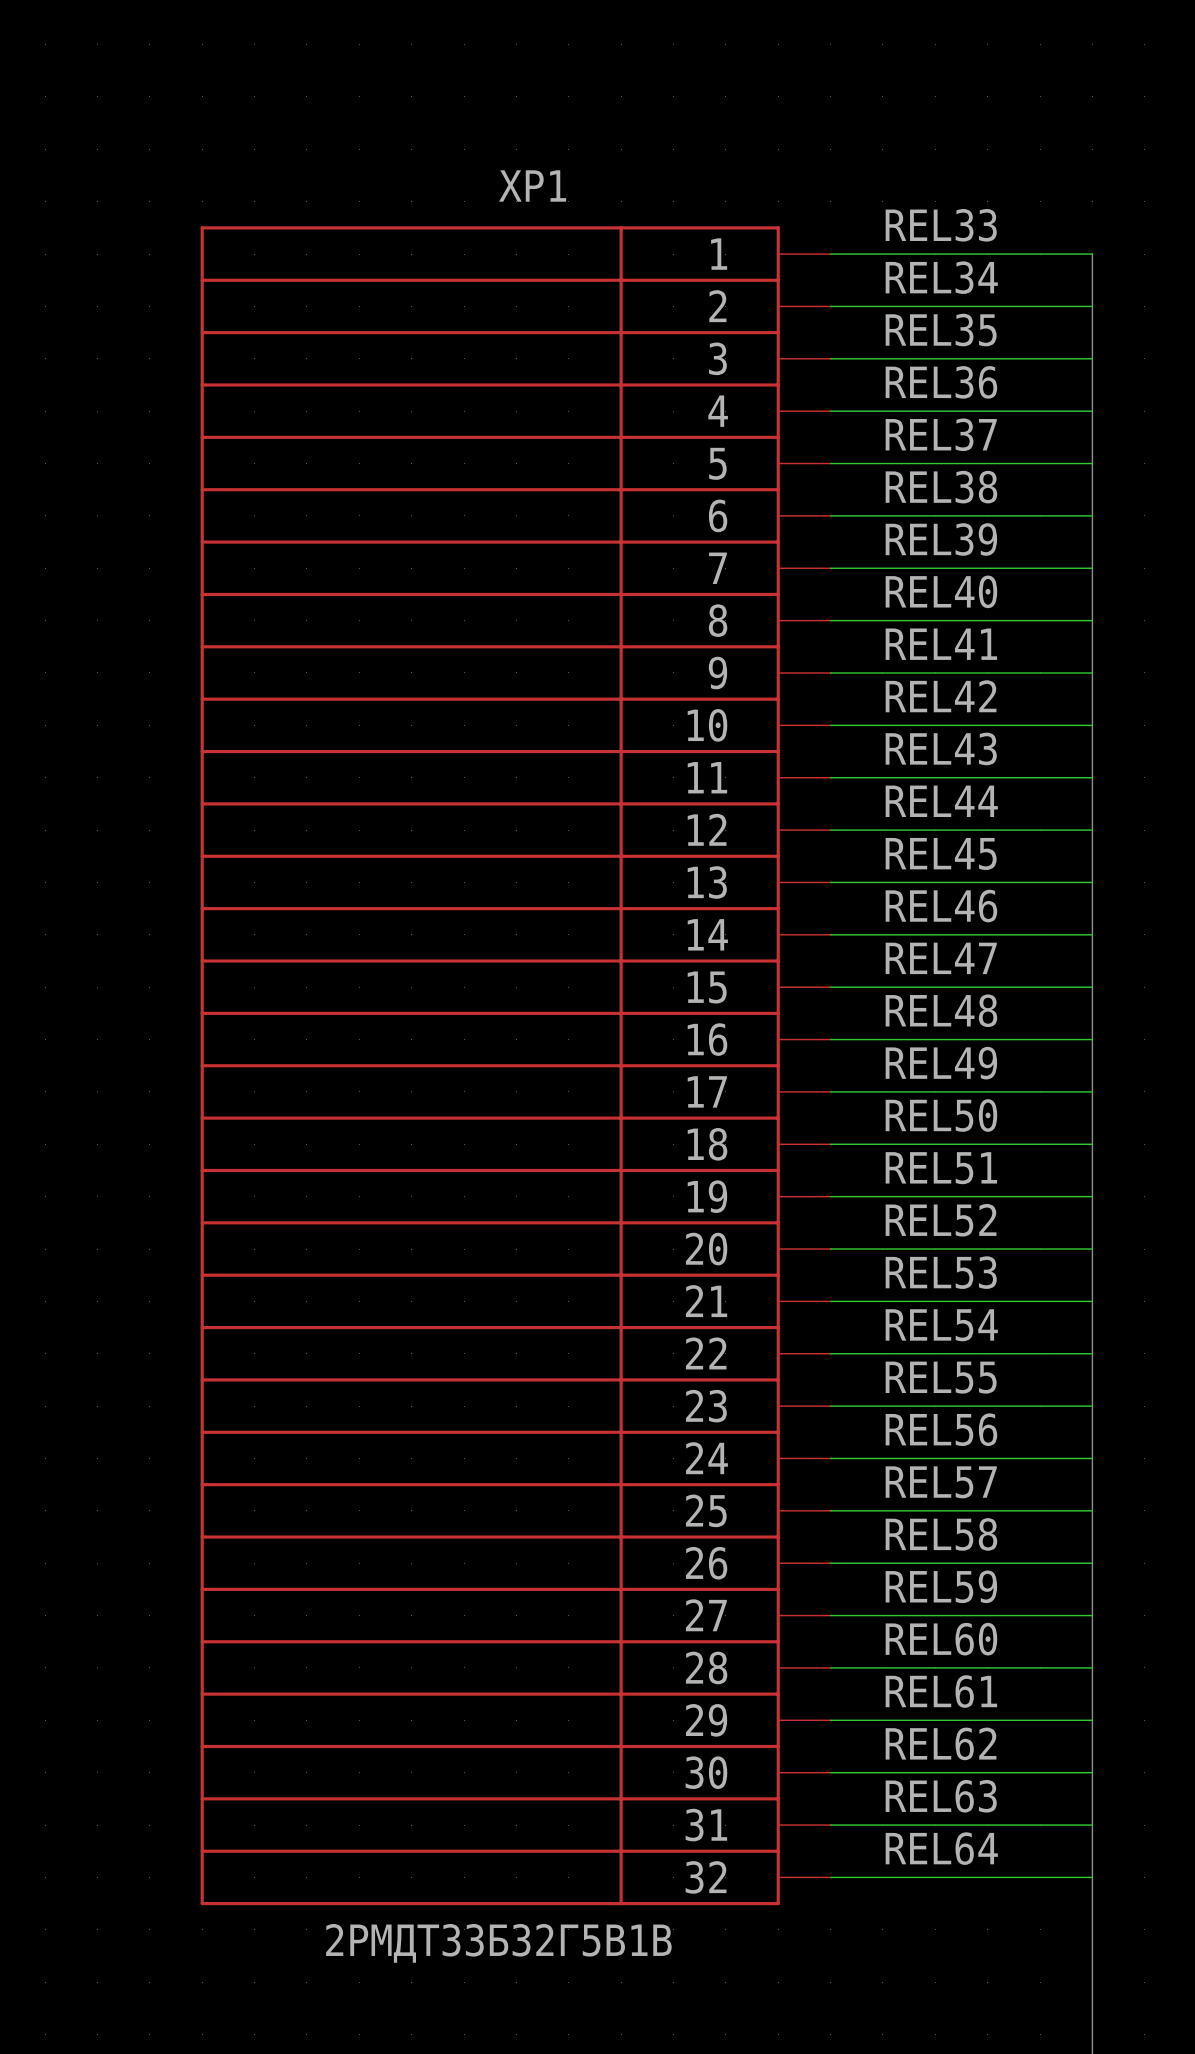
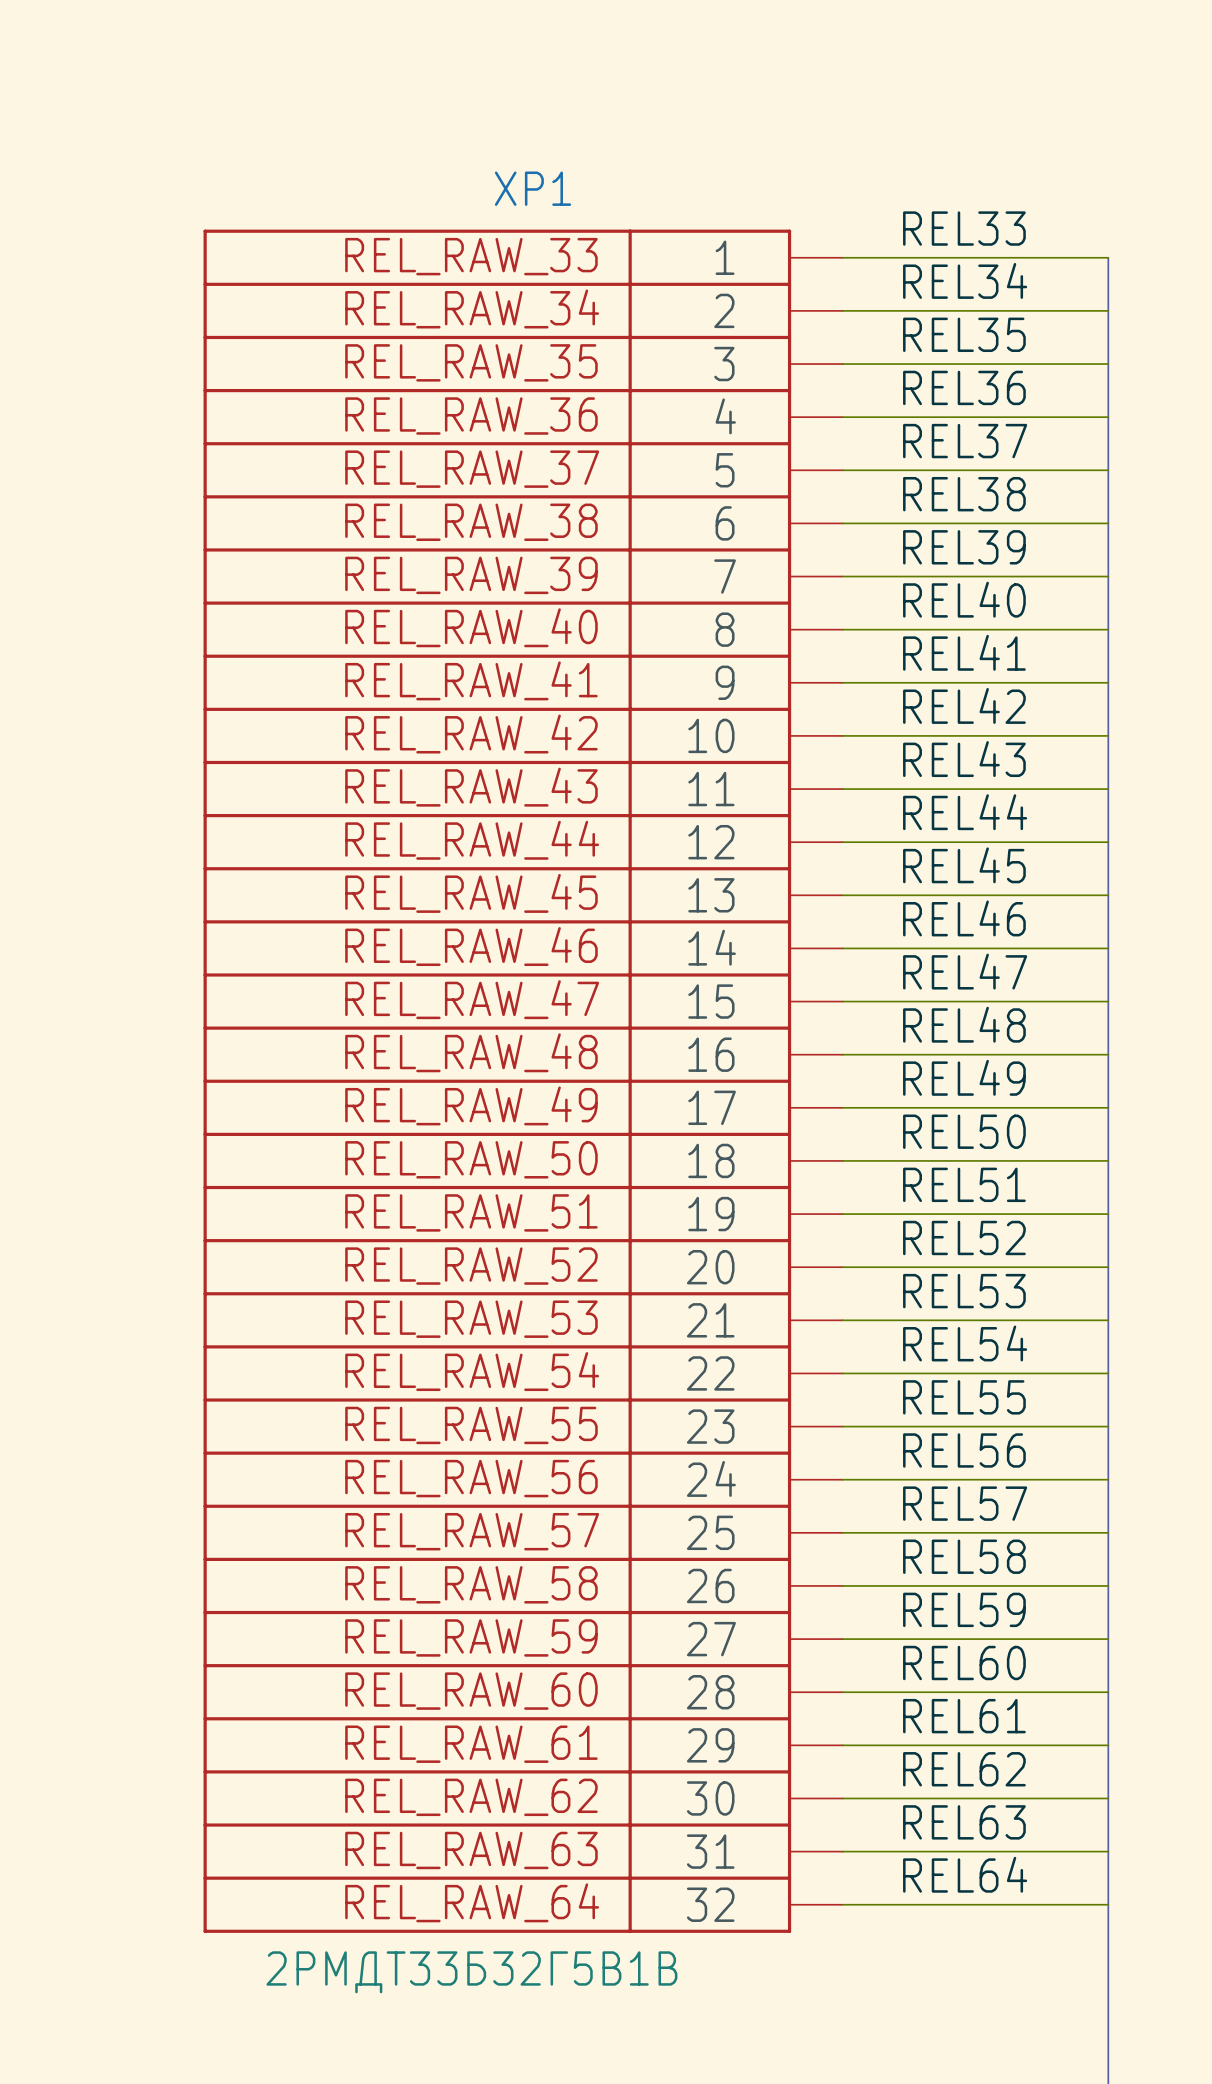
text: none -> REL_RAW_33 (471, 256)
text: none -> REL_RAW_34 (472, 309)
text: none -> REL_RAW_35 (471, 362)
text: none -> REL_RAW_36 (471, 416)
text: none -> REL_RAW_37 (472, 469)
text: none -> REL_RAW_38 (471, 522)
text: none -> REL_RAW_39 (471, 575)
text: none -> REL_RAW_40 (471, 627)
text: none -> REL_RAW_41 (471, 680)
text: none -> REL_RAW_42 (471, 734)
text: none -> REL_RAW_43 (471, 787)
text: none -> REL_RAW_44 (472, 840)
text: none -> REL_RAW_45 (471, 893)
text: none -> REL_RAW_46 (471, 946)
text: none -> REL_RAW_47 (472, 999)
text: none -> REL_RAW_48 (471, 1052)
text: none -> REL_RAW_49 (471, 1105)
text: none -> REL_RAW_50 (471, 1159)
text: none -> REL_RAW_51 (471, 1212)
text: none -> REL_RAW_52 (471, 1266)
text: none -> REL_RAW_53 (471, 1319)
text: none -> REL_RAW_54 (472, 1371)
text: none -> REL_RAW_55 (471, 1425)
text: none -> REL_RAW_56 (471, 1478)
text: none -> REL_RAW_57 (472, 1531)
text: none -> REL_RAW_58 (471, 1584)
text: none -> REL_RAW_59 (471, 1637)
text: none -> REL_RAW_60 (471, 1691)
text: none -> REL_RAW_61 (471, 1744)
text: none -> REL_RAW_62 (471, 1797)
text: none -> REL_RAW_63 (471, 1850)
text: none -> REL_RAW_64 (472, 1902)

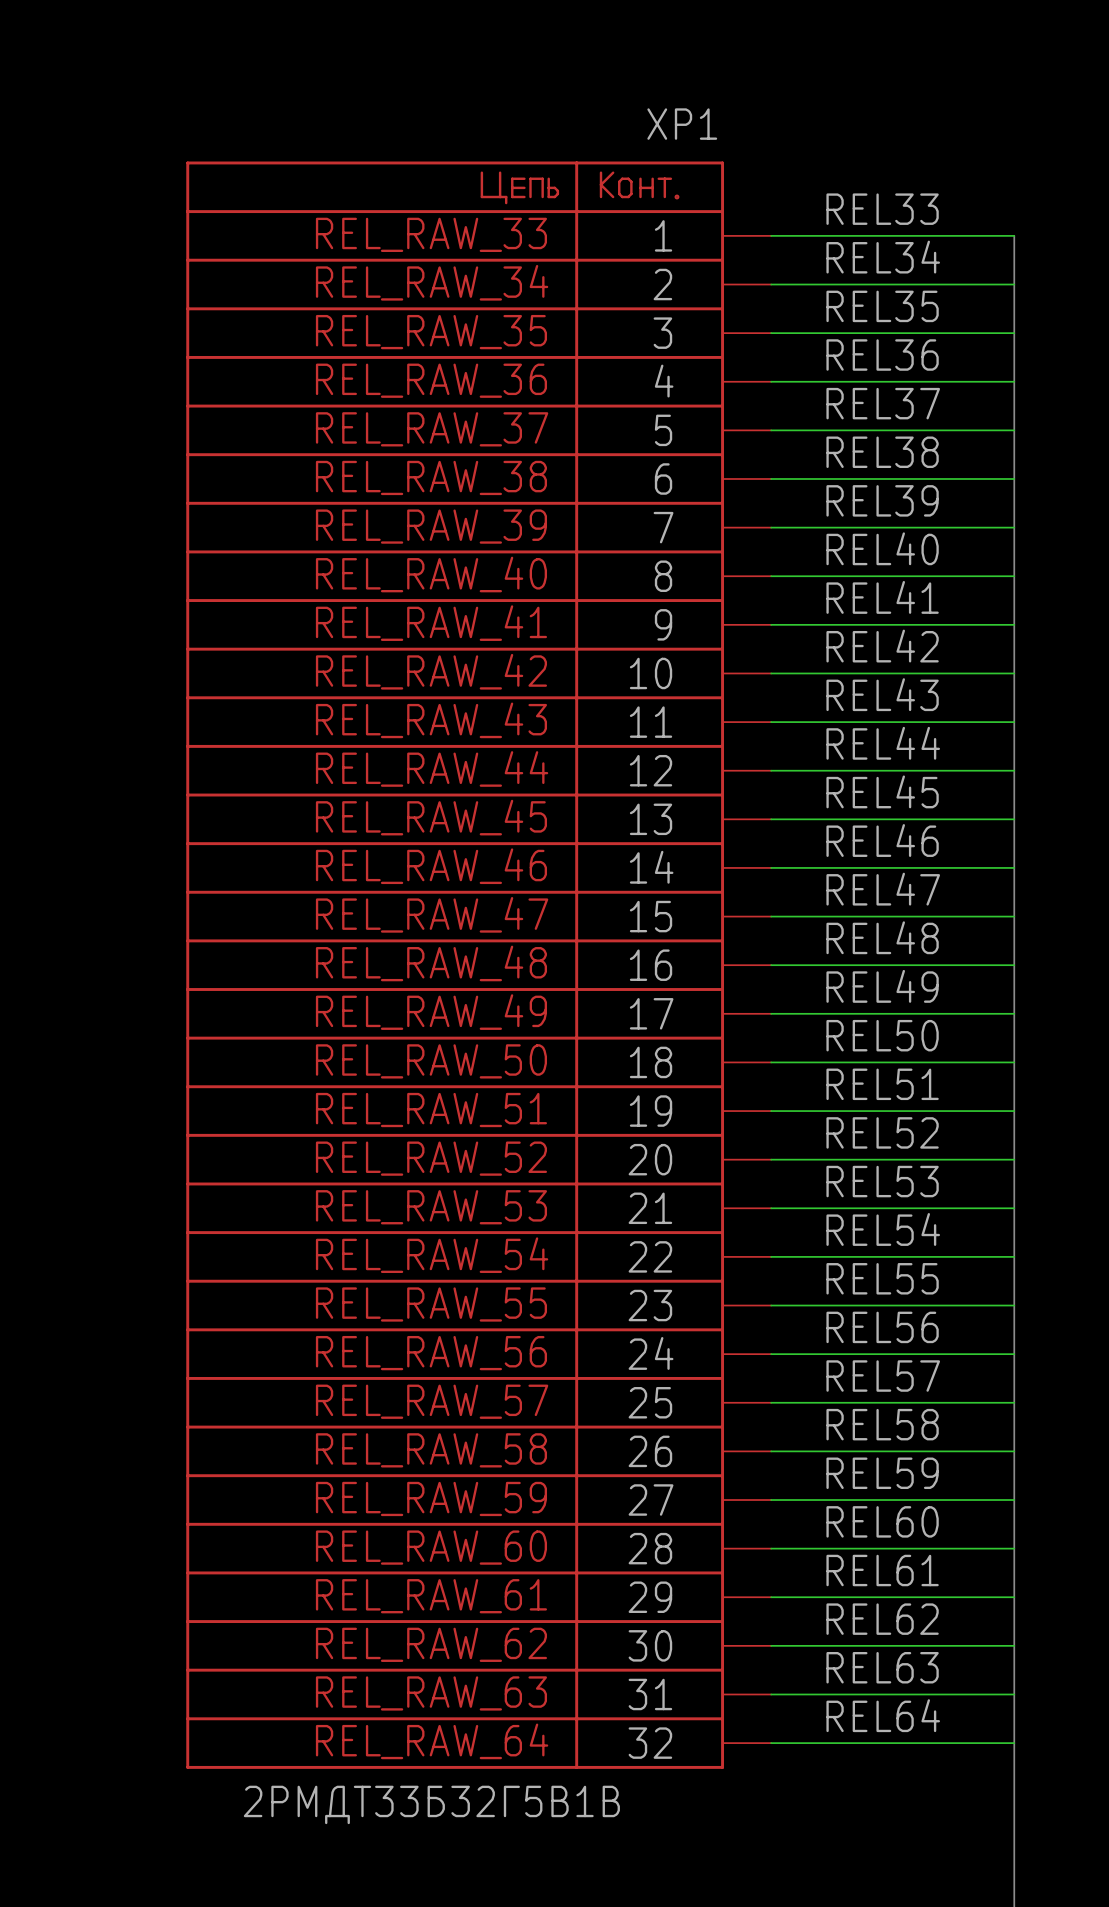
XP1 name position: XP1 (533, 188) -> XP1 (682, 124)
part: none -> (639, 185)
part: none -> (519, 187)
XP1 symbol: [203, 229, 843, 1933] -> [186, 161, 772, 1769]

